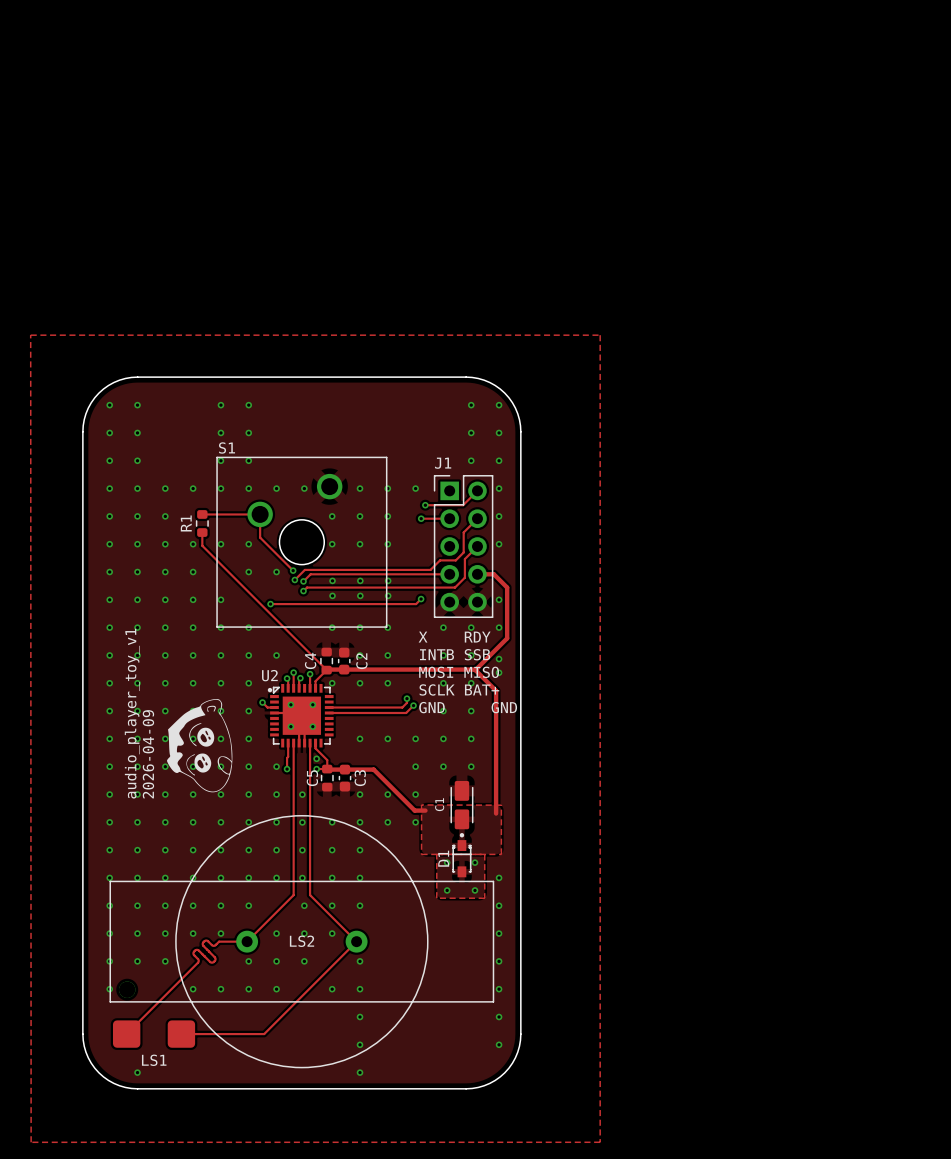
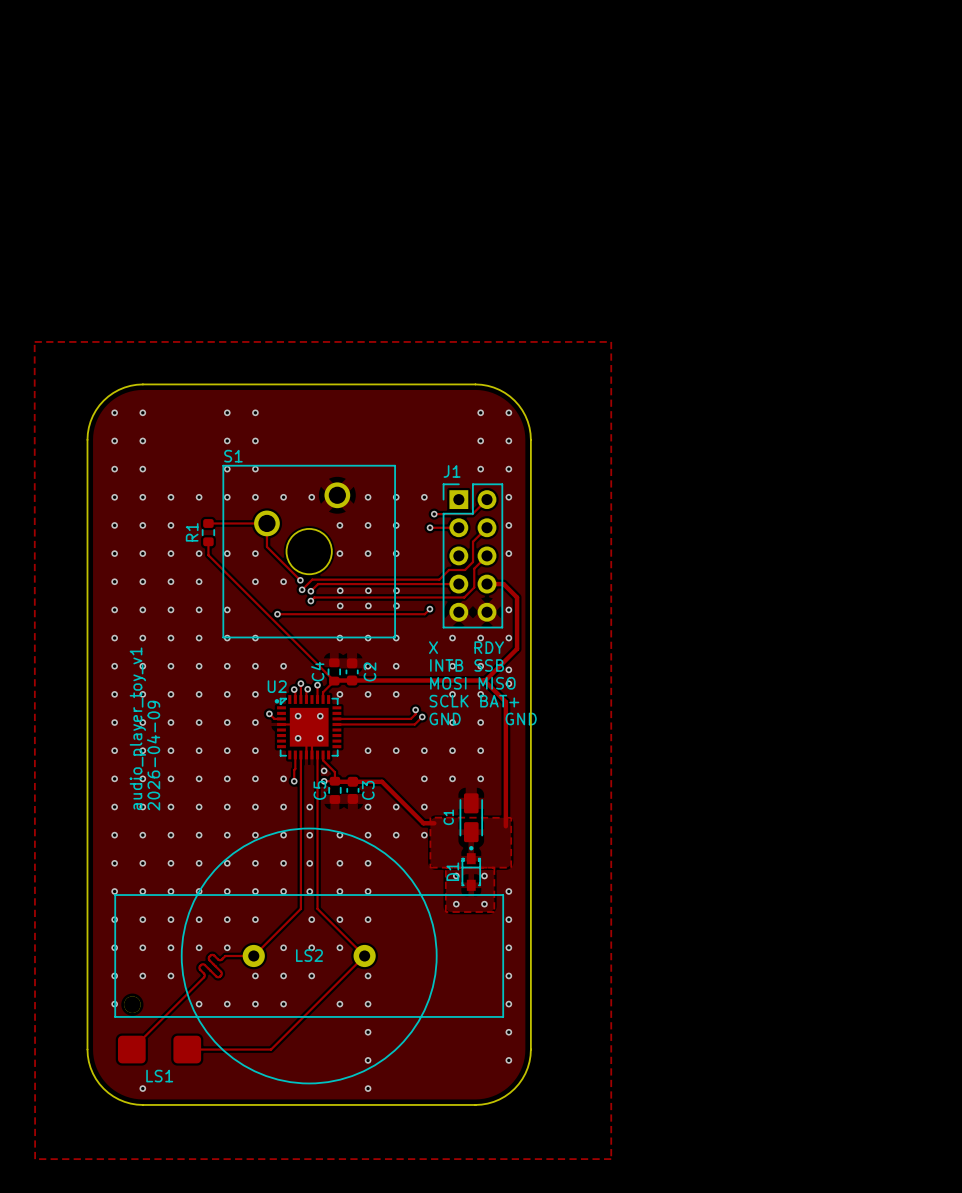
drawing: [167, 699, 233, 793] -> none

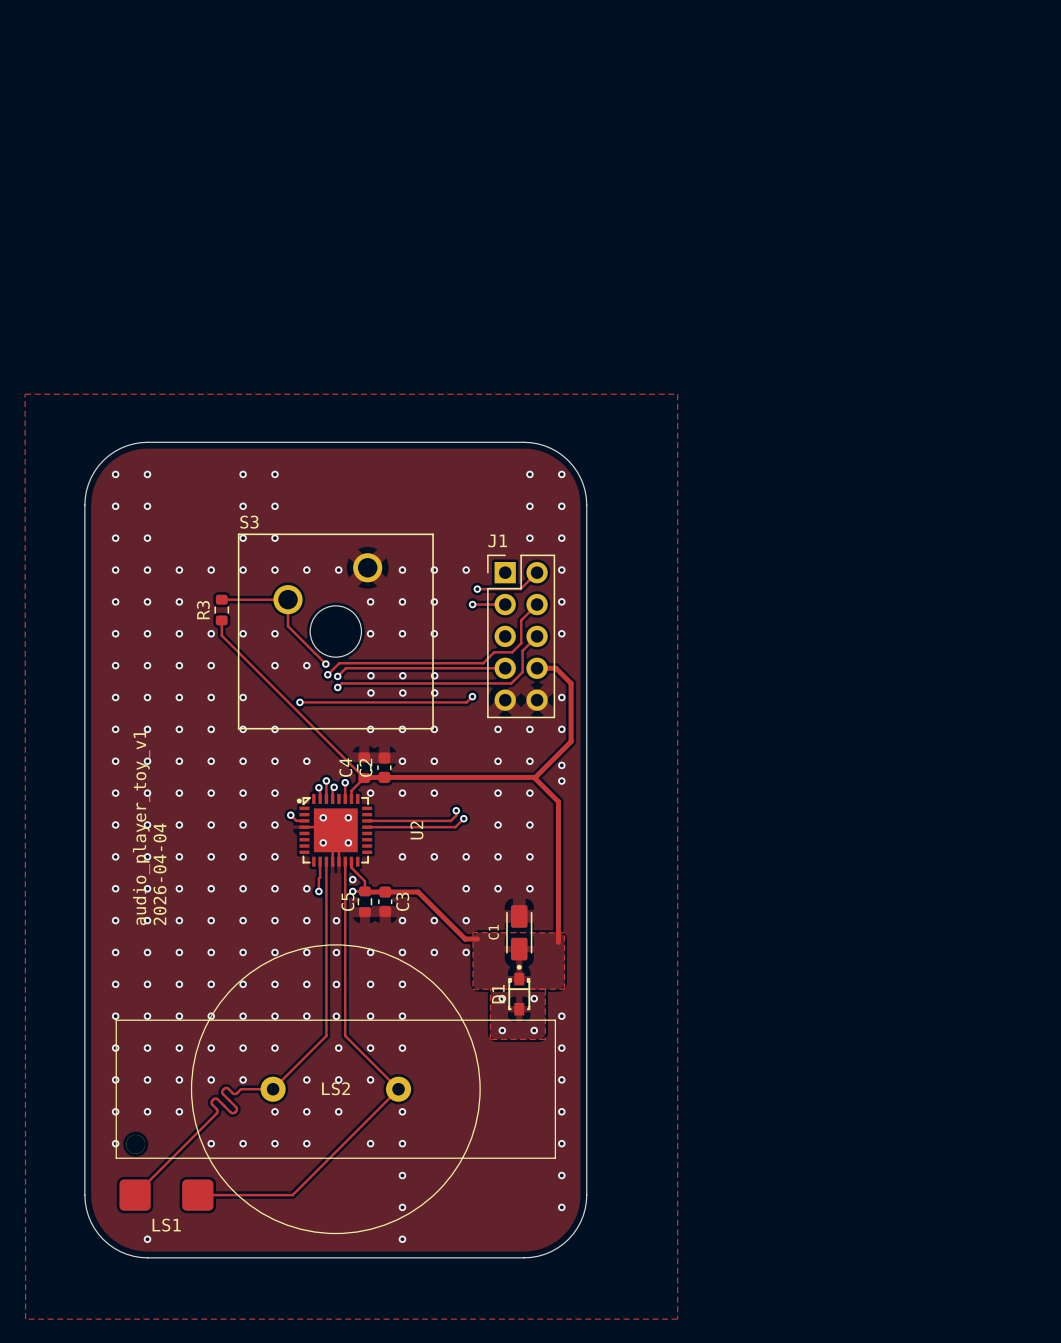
S1 name: S1 (233, 456) -> S3 (249, 522)
R1 name: R1 (192, 532) -> R3 (203, 610)
text: X RDY (466, 647) -> none
text: INTB SSB (467, 665) -> none
C2 name position: C2 (369, 671) -> C2 (365, 767)
text: MOSI MISO (472, 683) -> none
U2 name rotation: 0° (277, 686) -> 90° counterclockwise (416, 830)
U2 name position: U2 (277, 686) -> U2 (416, 830)
text: SCLK BAT+ (474, 701) -> none
text: GND GND (483, 719) -> none
text: 2026-04-09 (153, 755) -> 2026-04-04 (160, 874)

